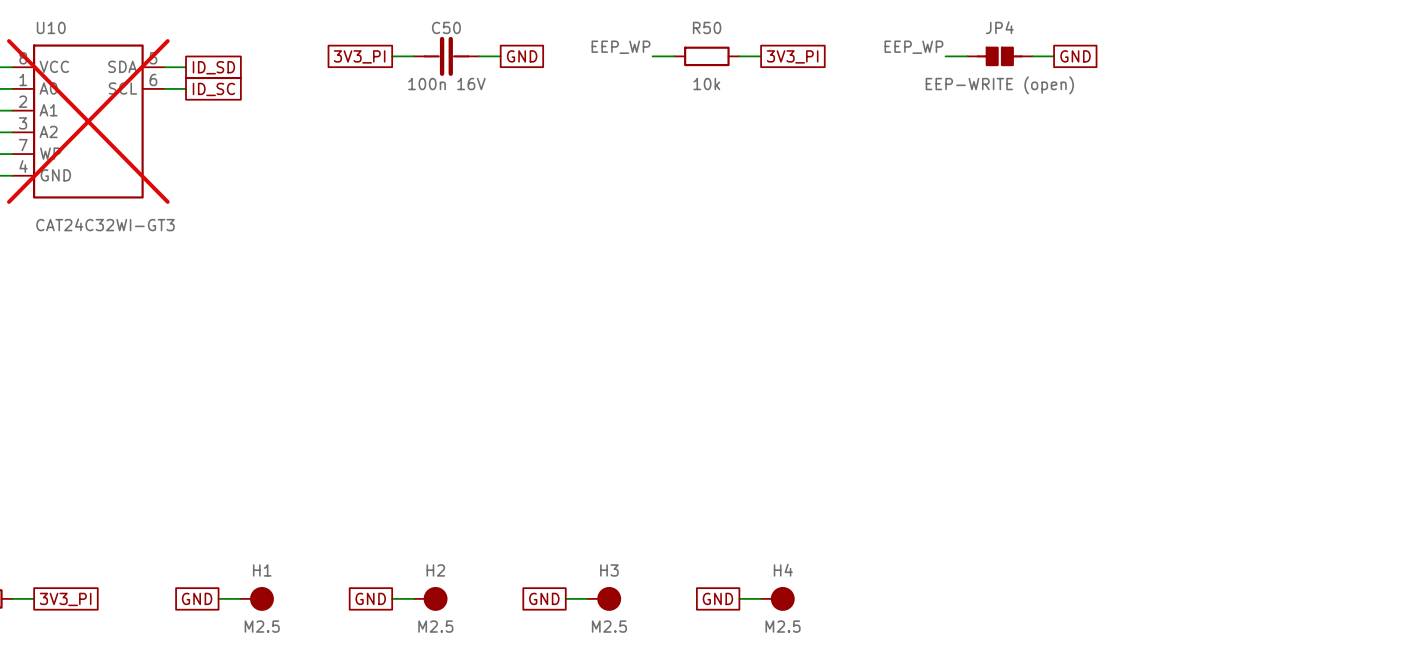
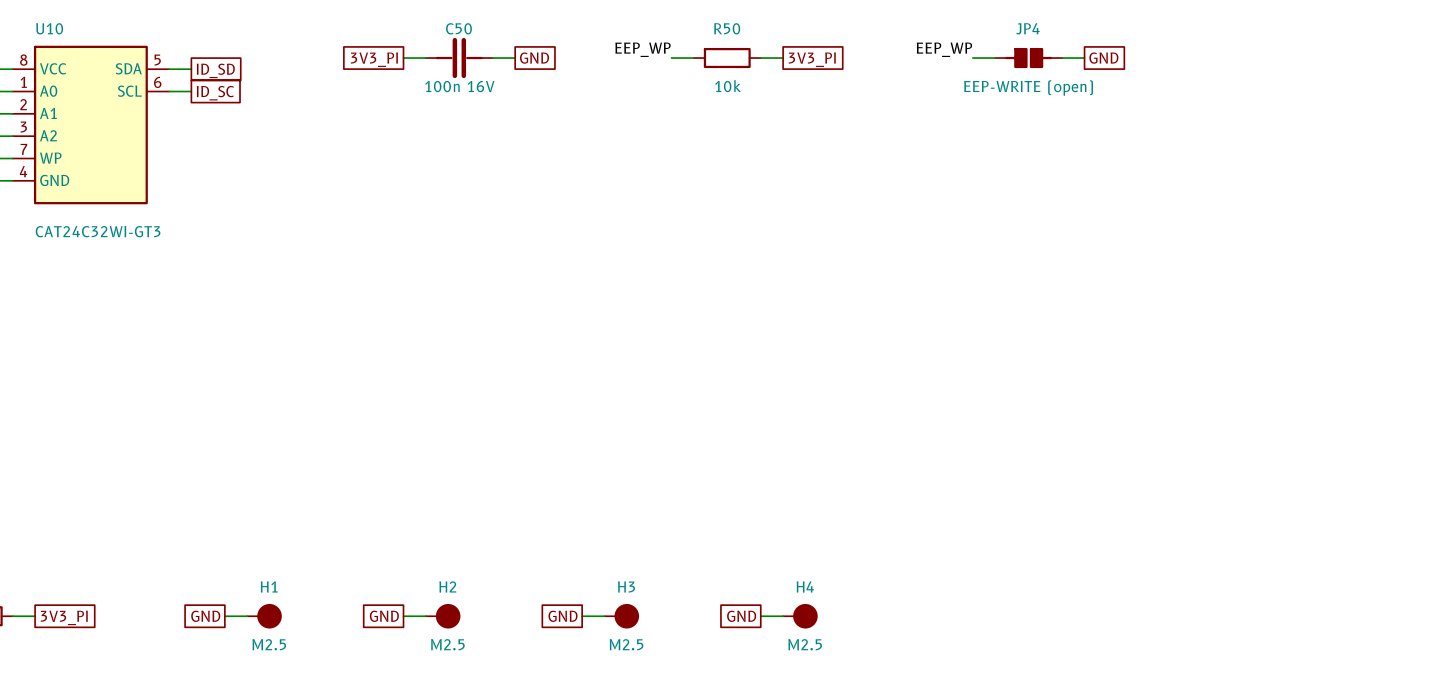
U10 do-not-place cross: (88, 121) -> none

